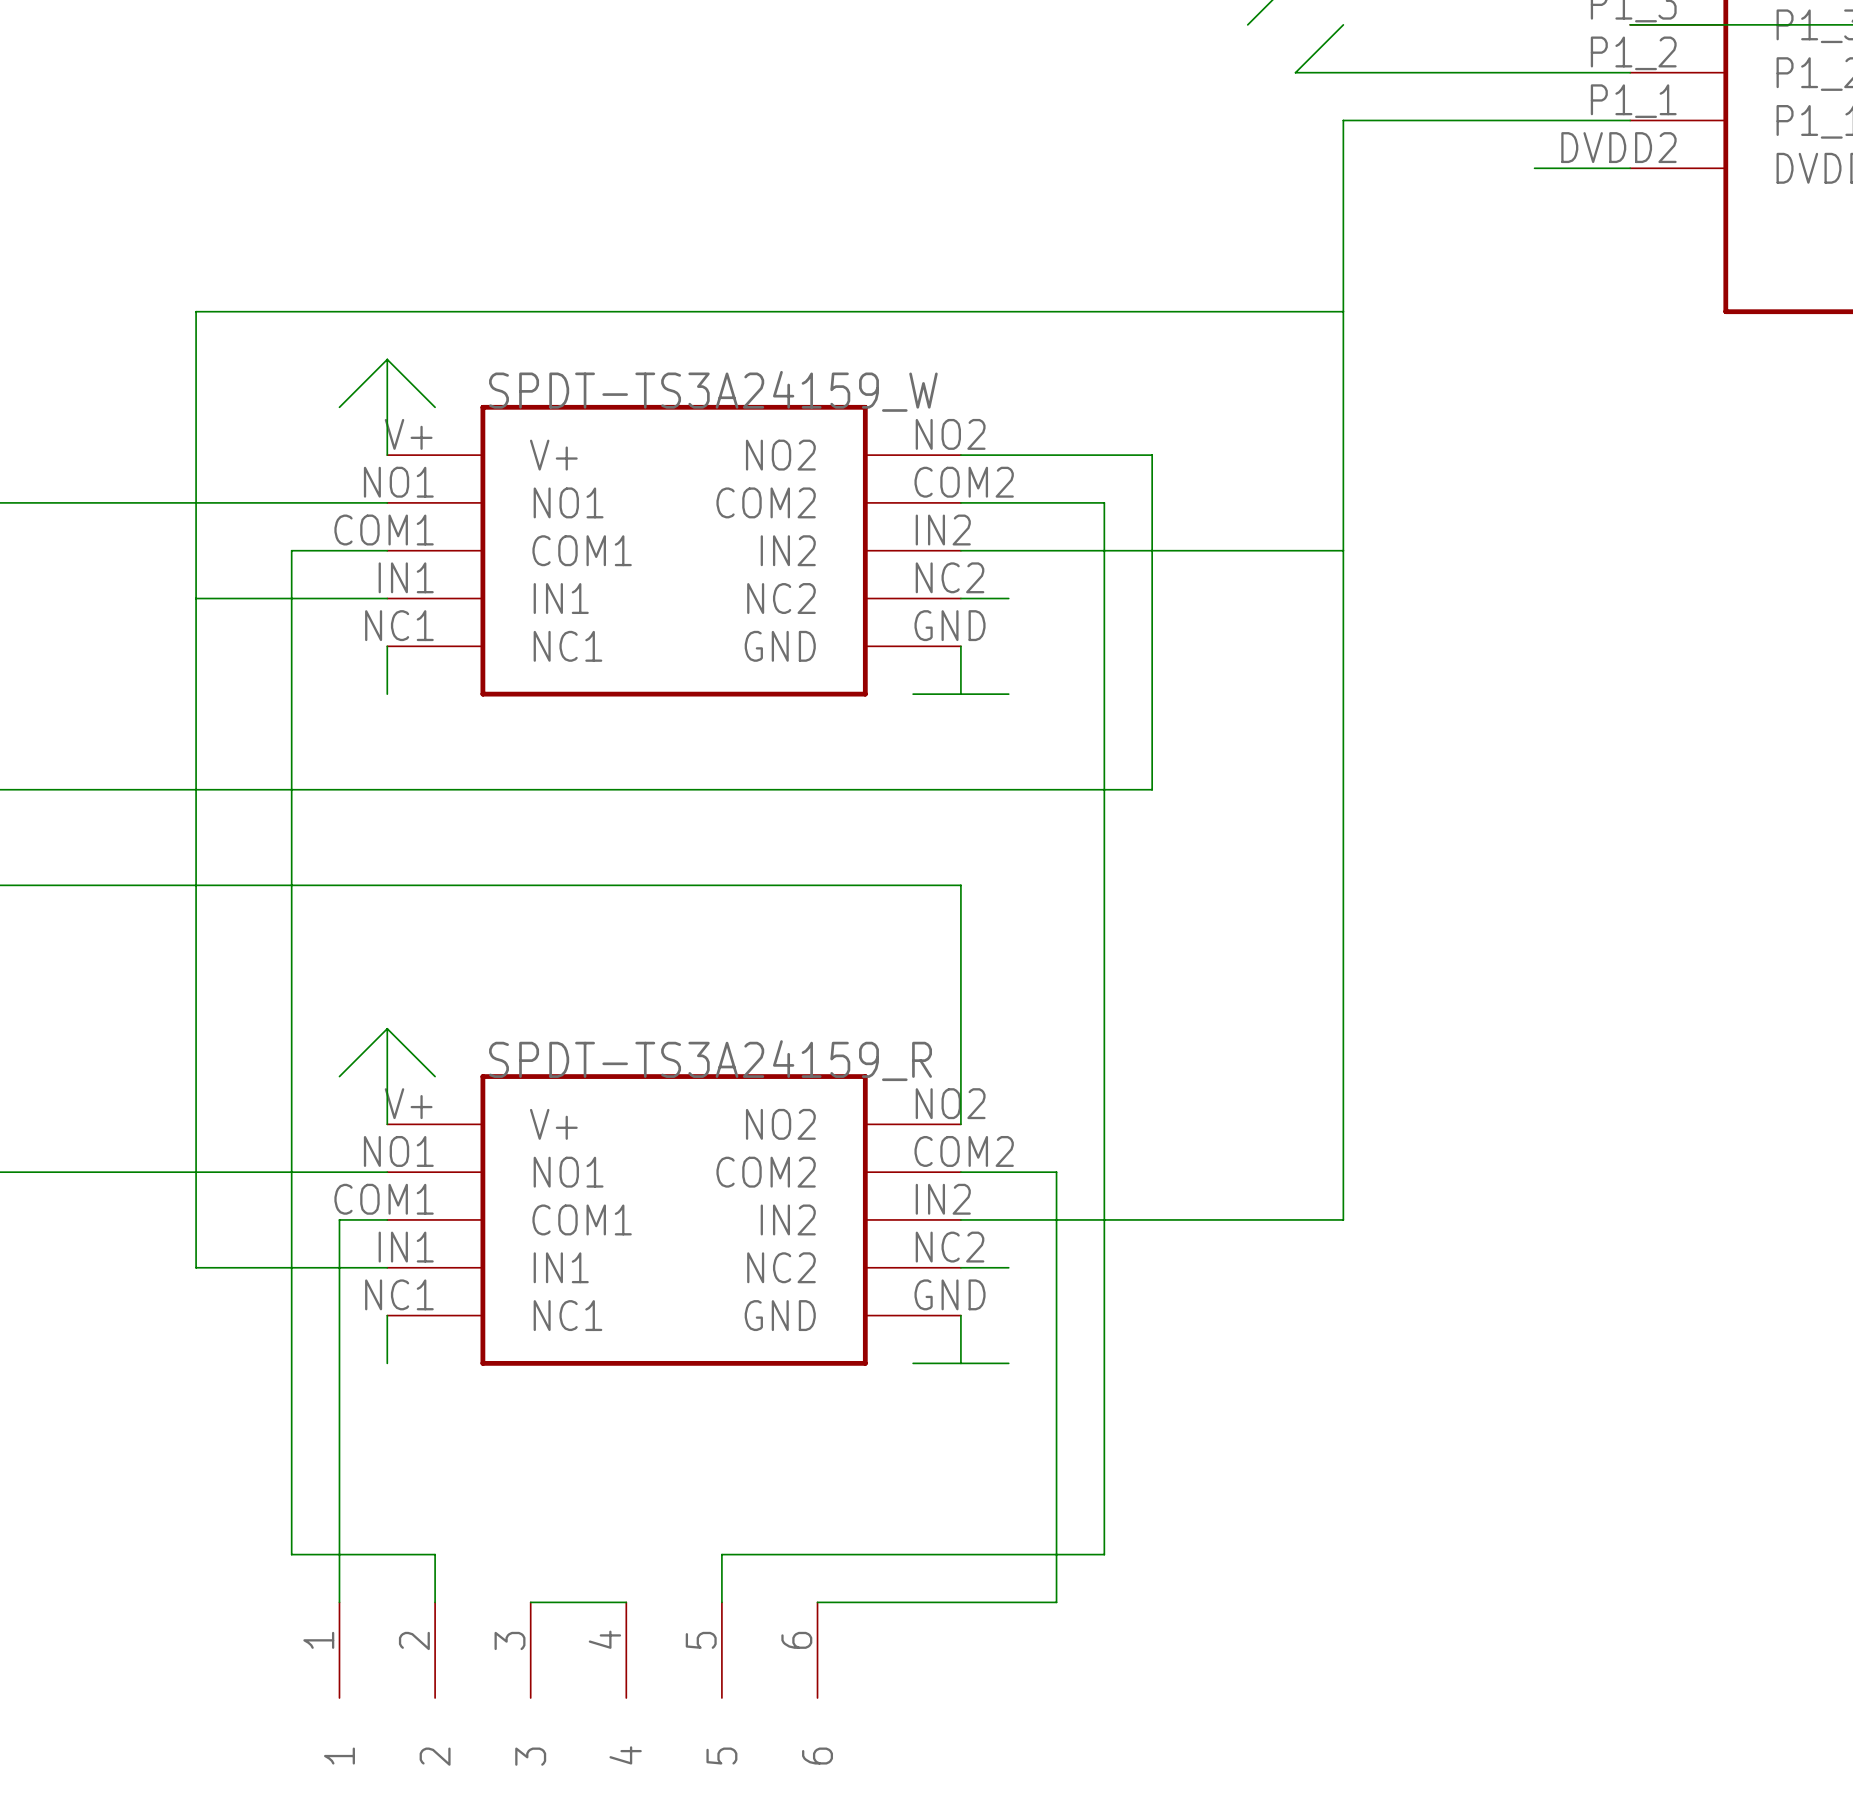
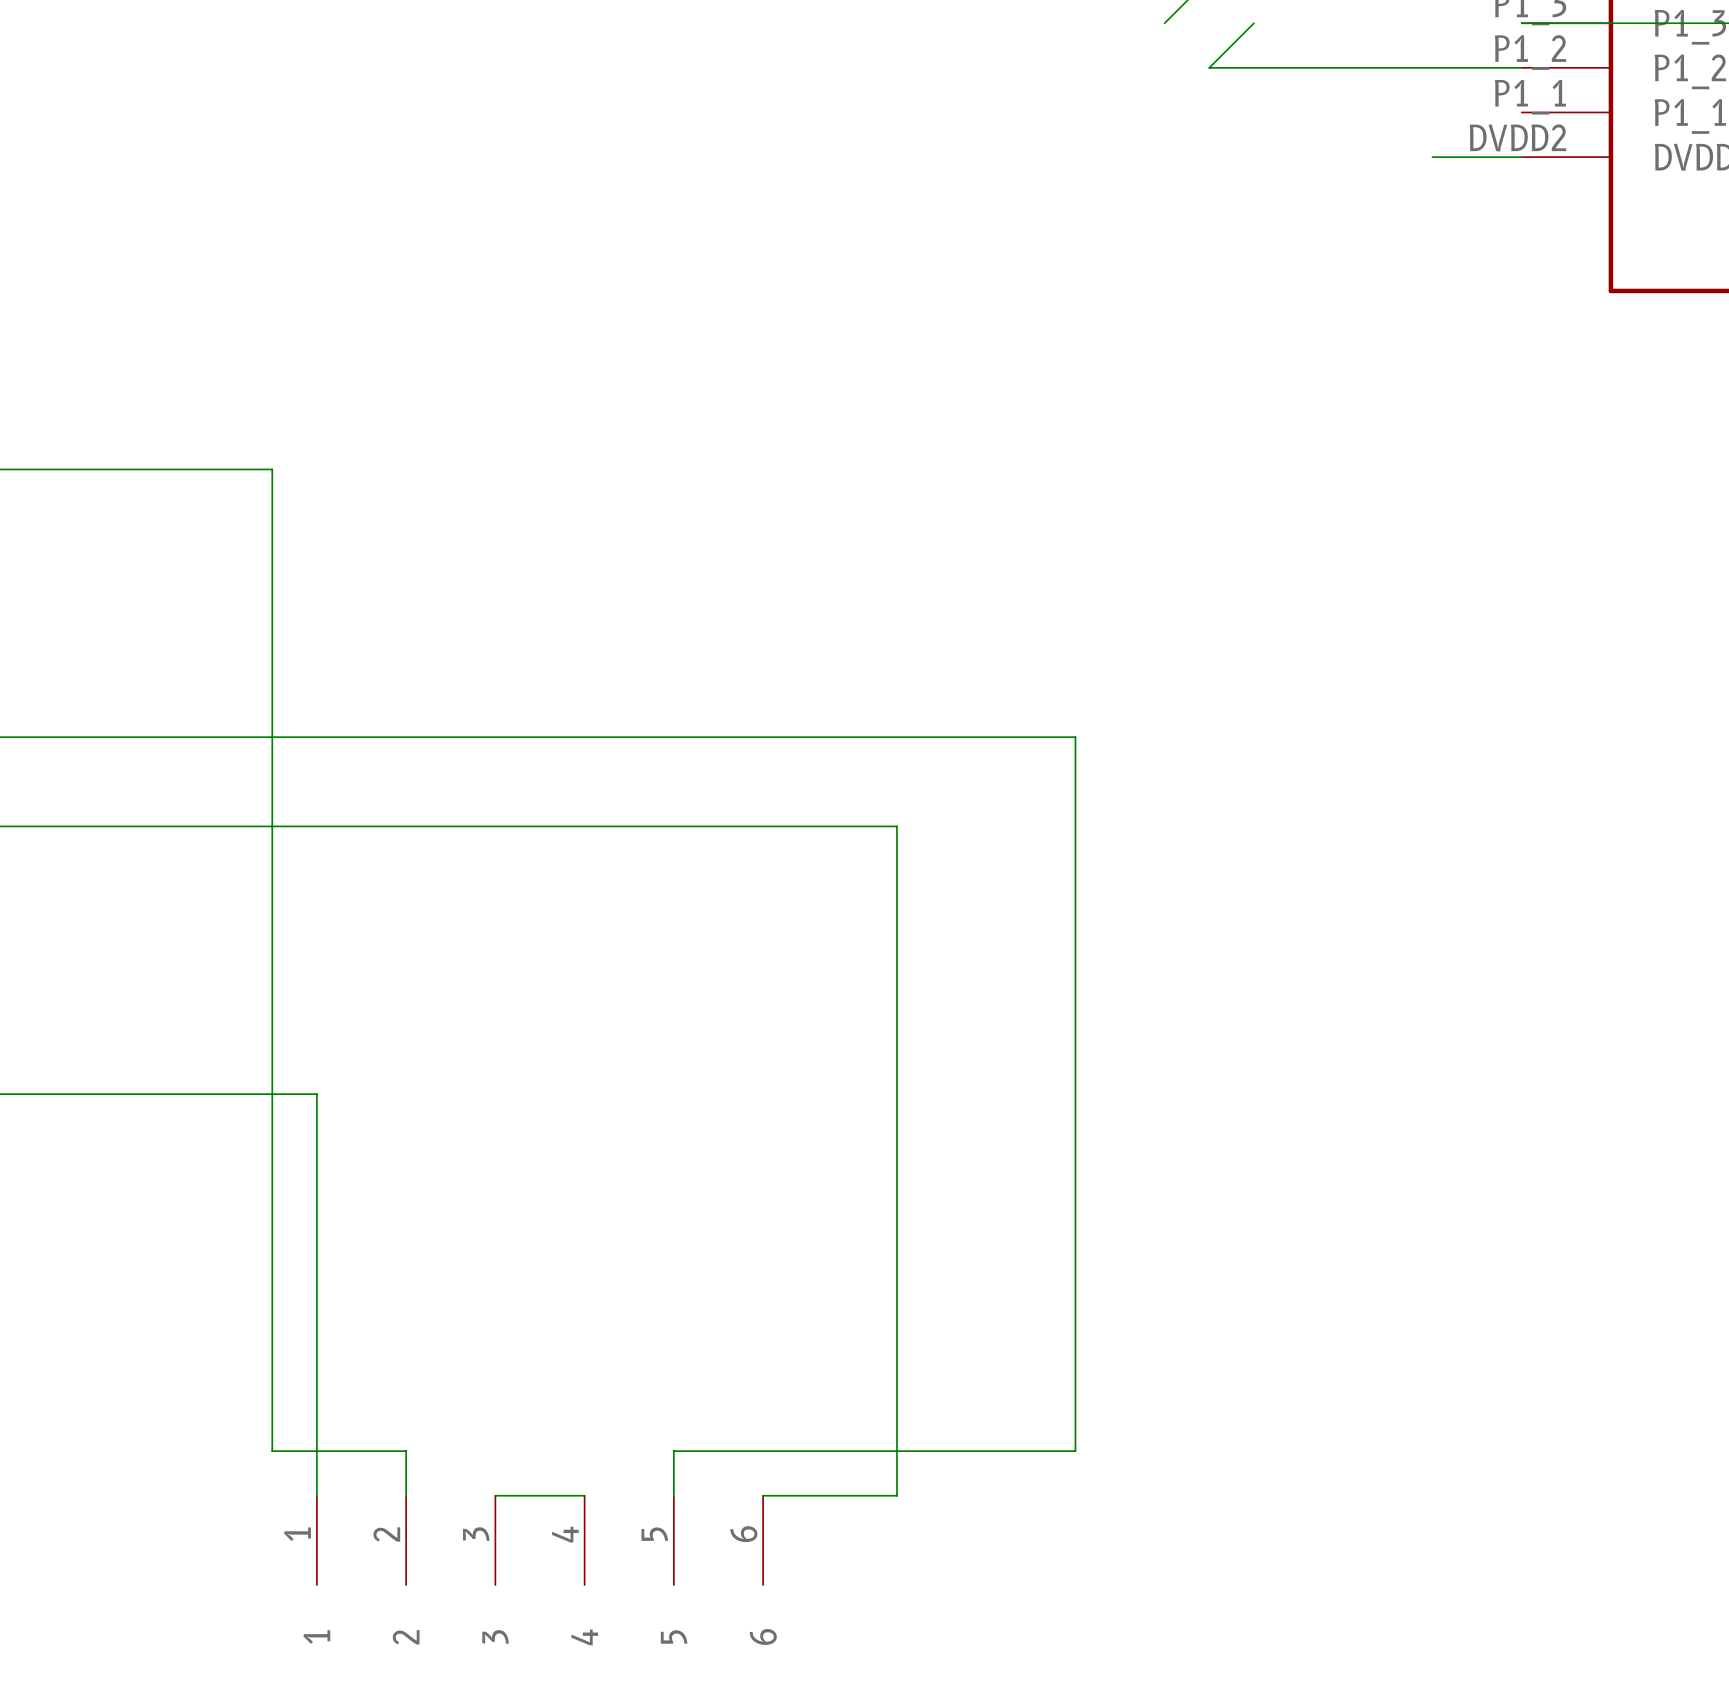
wire: (1630, 120) (1343, 120) (1343, 1219) (960, 1219) -> none
wire: (1343, 311) (196, 311) (196, 1267) (387, 1267) -> none
wire: (387, 359) (435, 407) -> none
wire: (387, 359) (387, 455) -> none
wire: (387, 359) (339, 407) -> none
wire: (960, 455) (1152, 455) (1152, 789) -> none
wire: (291, 502) (387, 502) -> (272, 469) (272, 514)
wire: (960, 502) (1104, 502) (1104, 1554) -> (1075, 737) (1075, 1451) (1030, 1451)
wire: (291, 550) (387, 550) -> none
part: (674, 550) -> none
wire: (960, 550) (1343, 550) -> none
wire: (196, 598) (387, 598) -> none
wire: (960, 598) (1008, 598) -> none
wire: (387, 646) (387, 694) -> none
wire: (960, 646) (960, 694) -> none
wire: (913, 694) (1008, 694) -> none
wire: (387, 1028) (387, 1124) -> none
wire: (387, 1028) (435, 1076) -> none
wire: (387, 1028) (339, 1076) -> none
wire: none -> (896, 1049) (896, 1228)
wire: (339, 1172) (387, 1172) -> (316, 1094) (316, 1138)
wire: (960, 1172) (1056, 1172) (1056, 1602) (960, 1602) -> (896, 1272) (896, 1495)
wire: (339, 1219) (387, 1219) -> none
part: (674, 1219) -> none
wire: (960, 1267) (1008, 1267) -> none
wire: (387, 1315) (387, 1363) -> none
wire: (913, 1363) (1008, 1363) -> none

